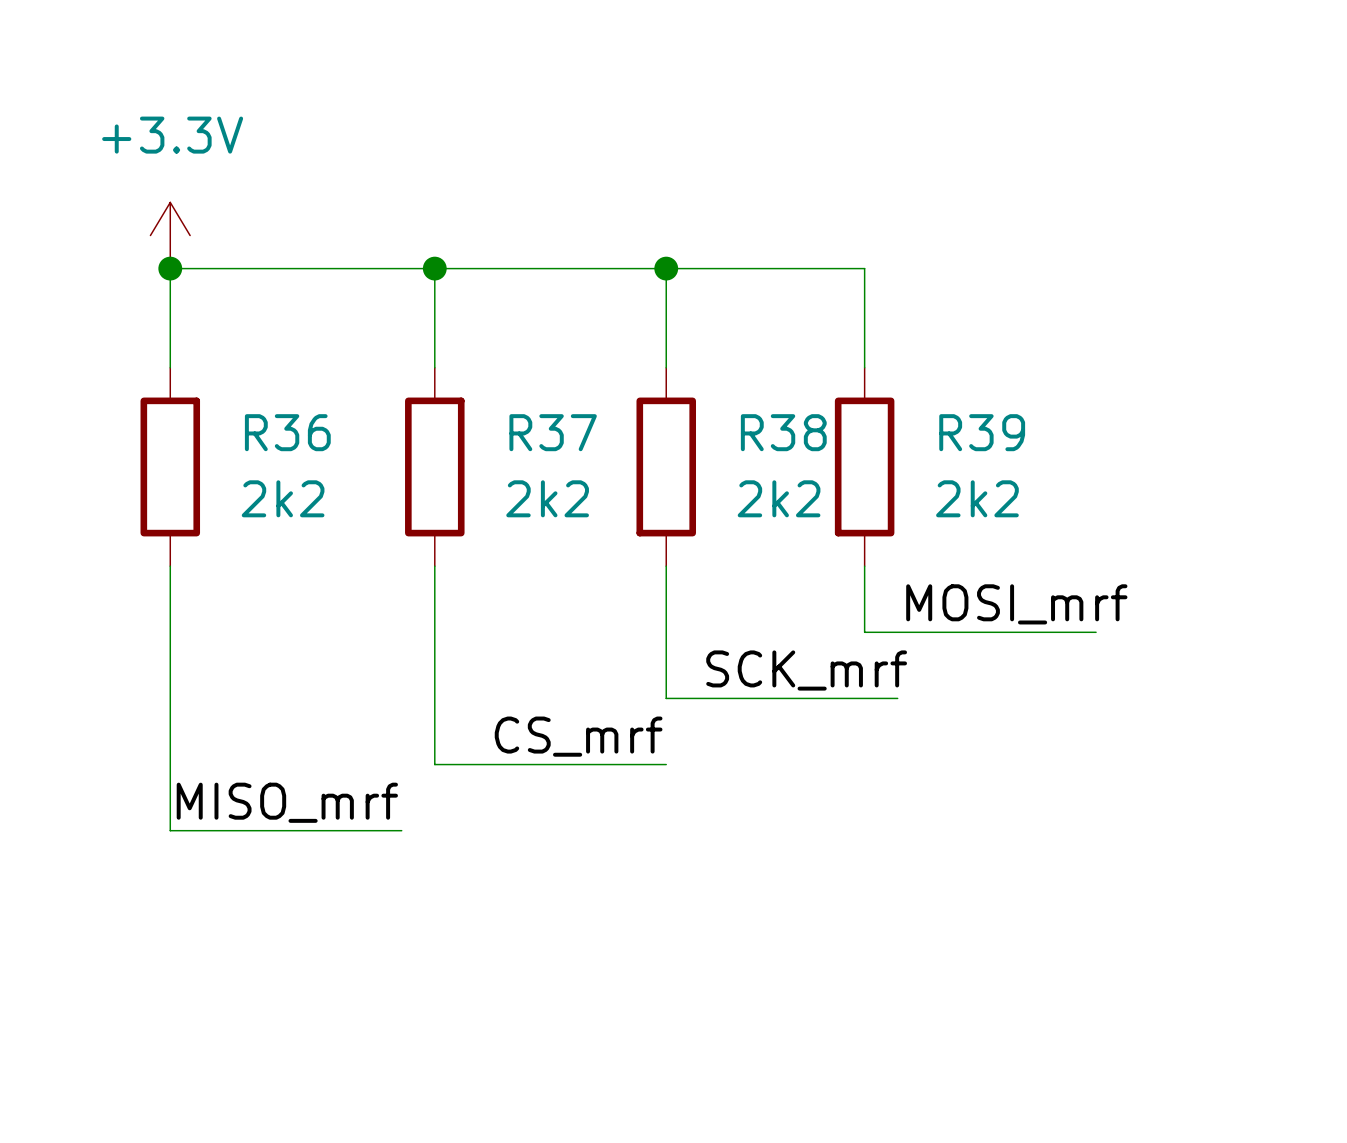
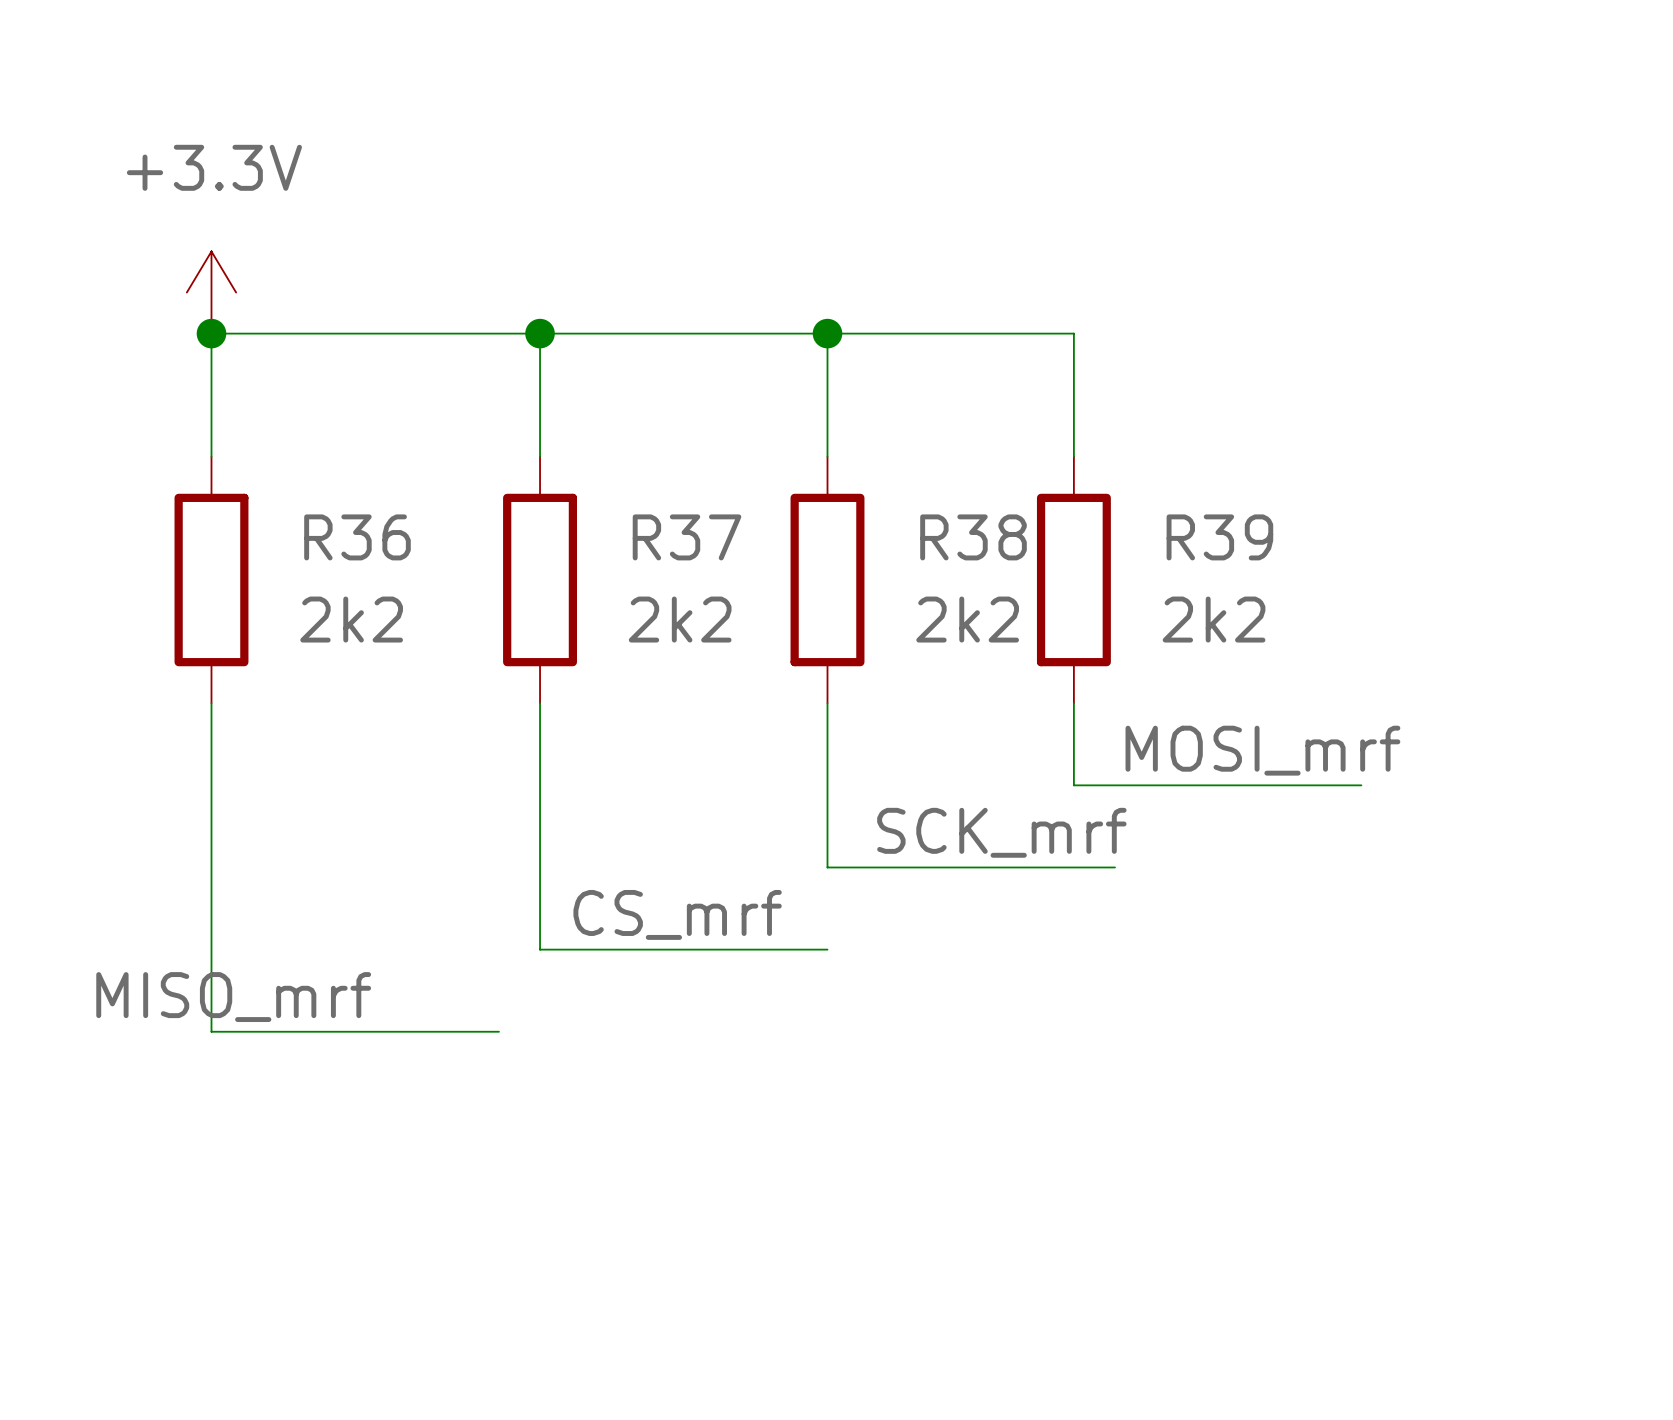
label position: CS_mrf (578, 736) -> CS_mrf (677, 914)
label position: MISO_mrf (287, 802) -> MISO_mrf (233, 997)

